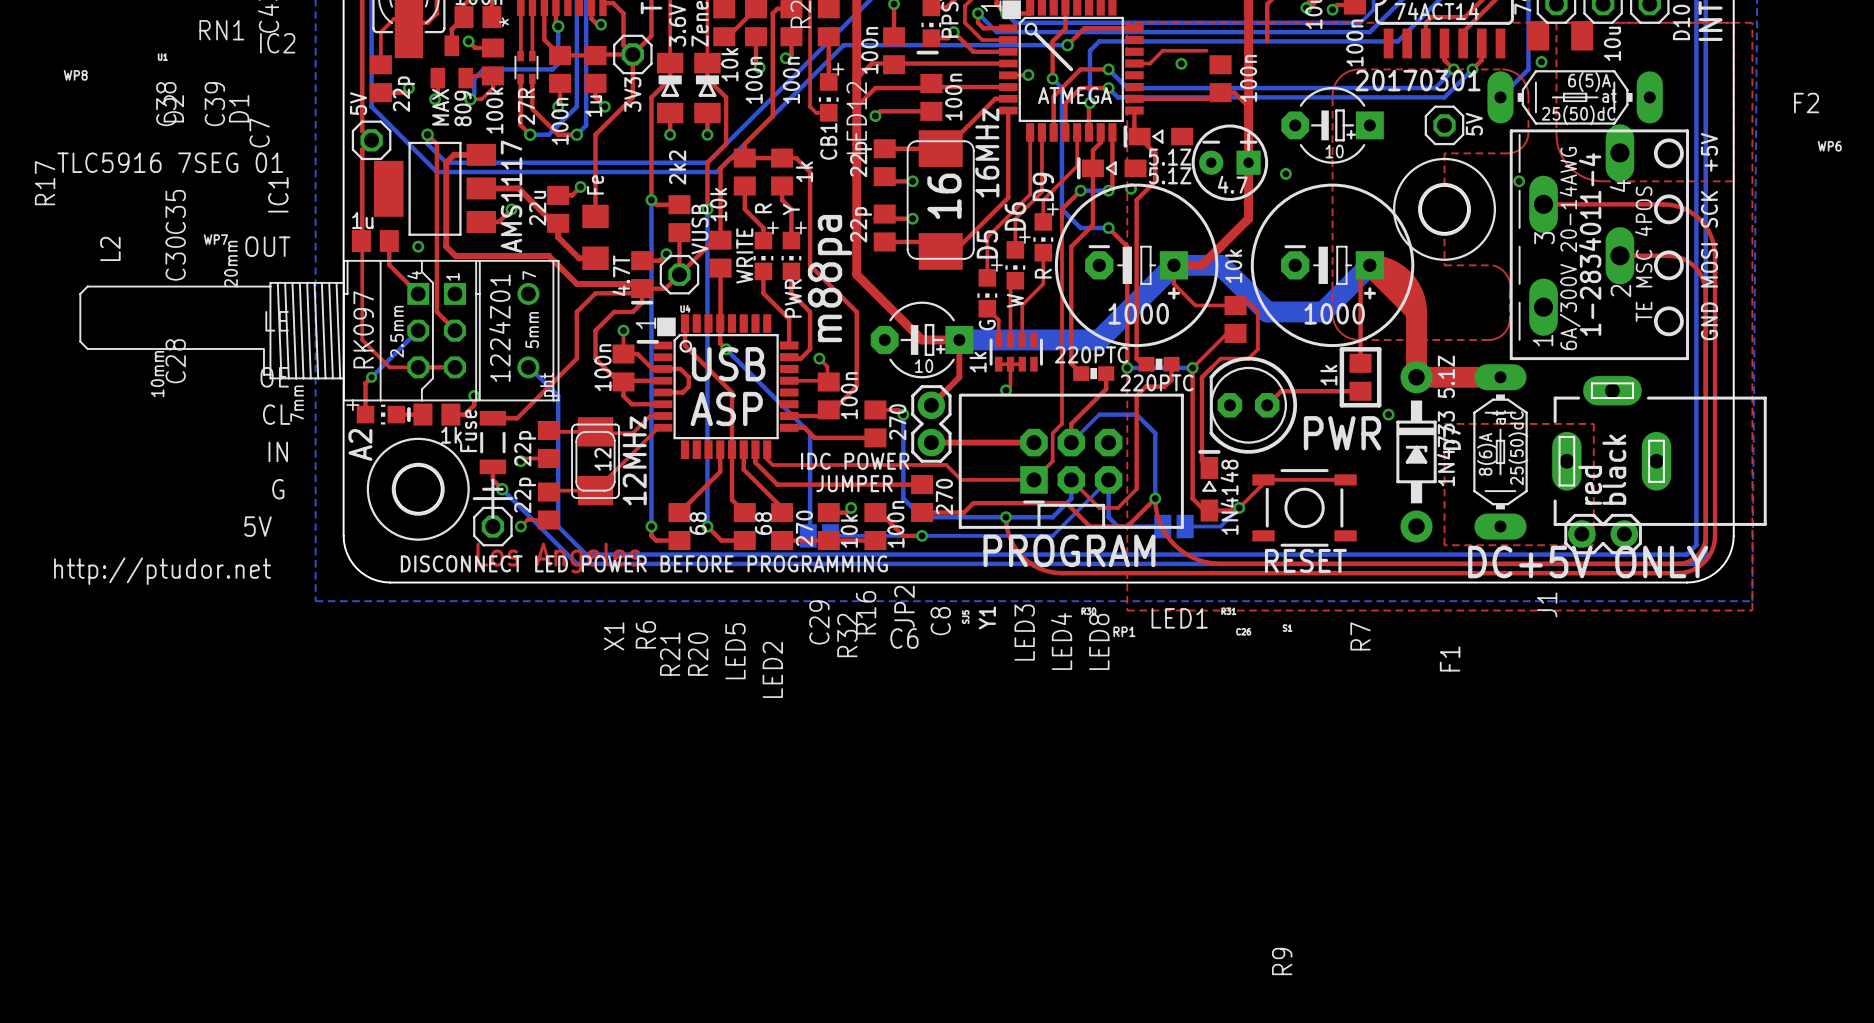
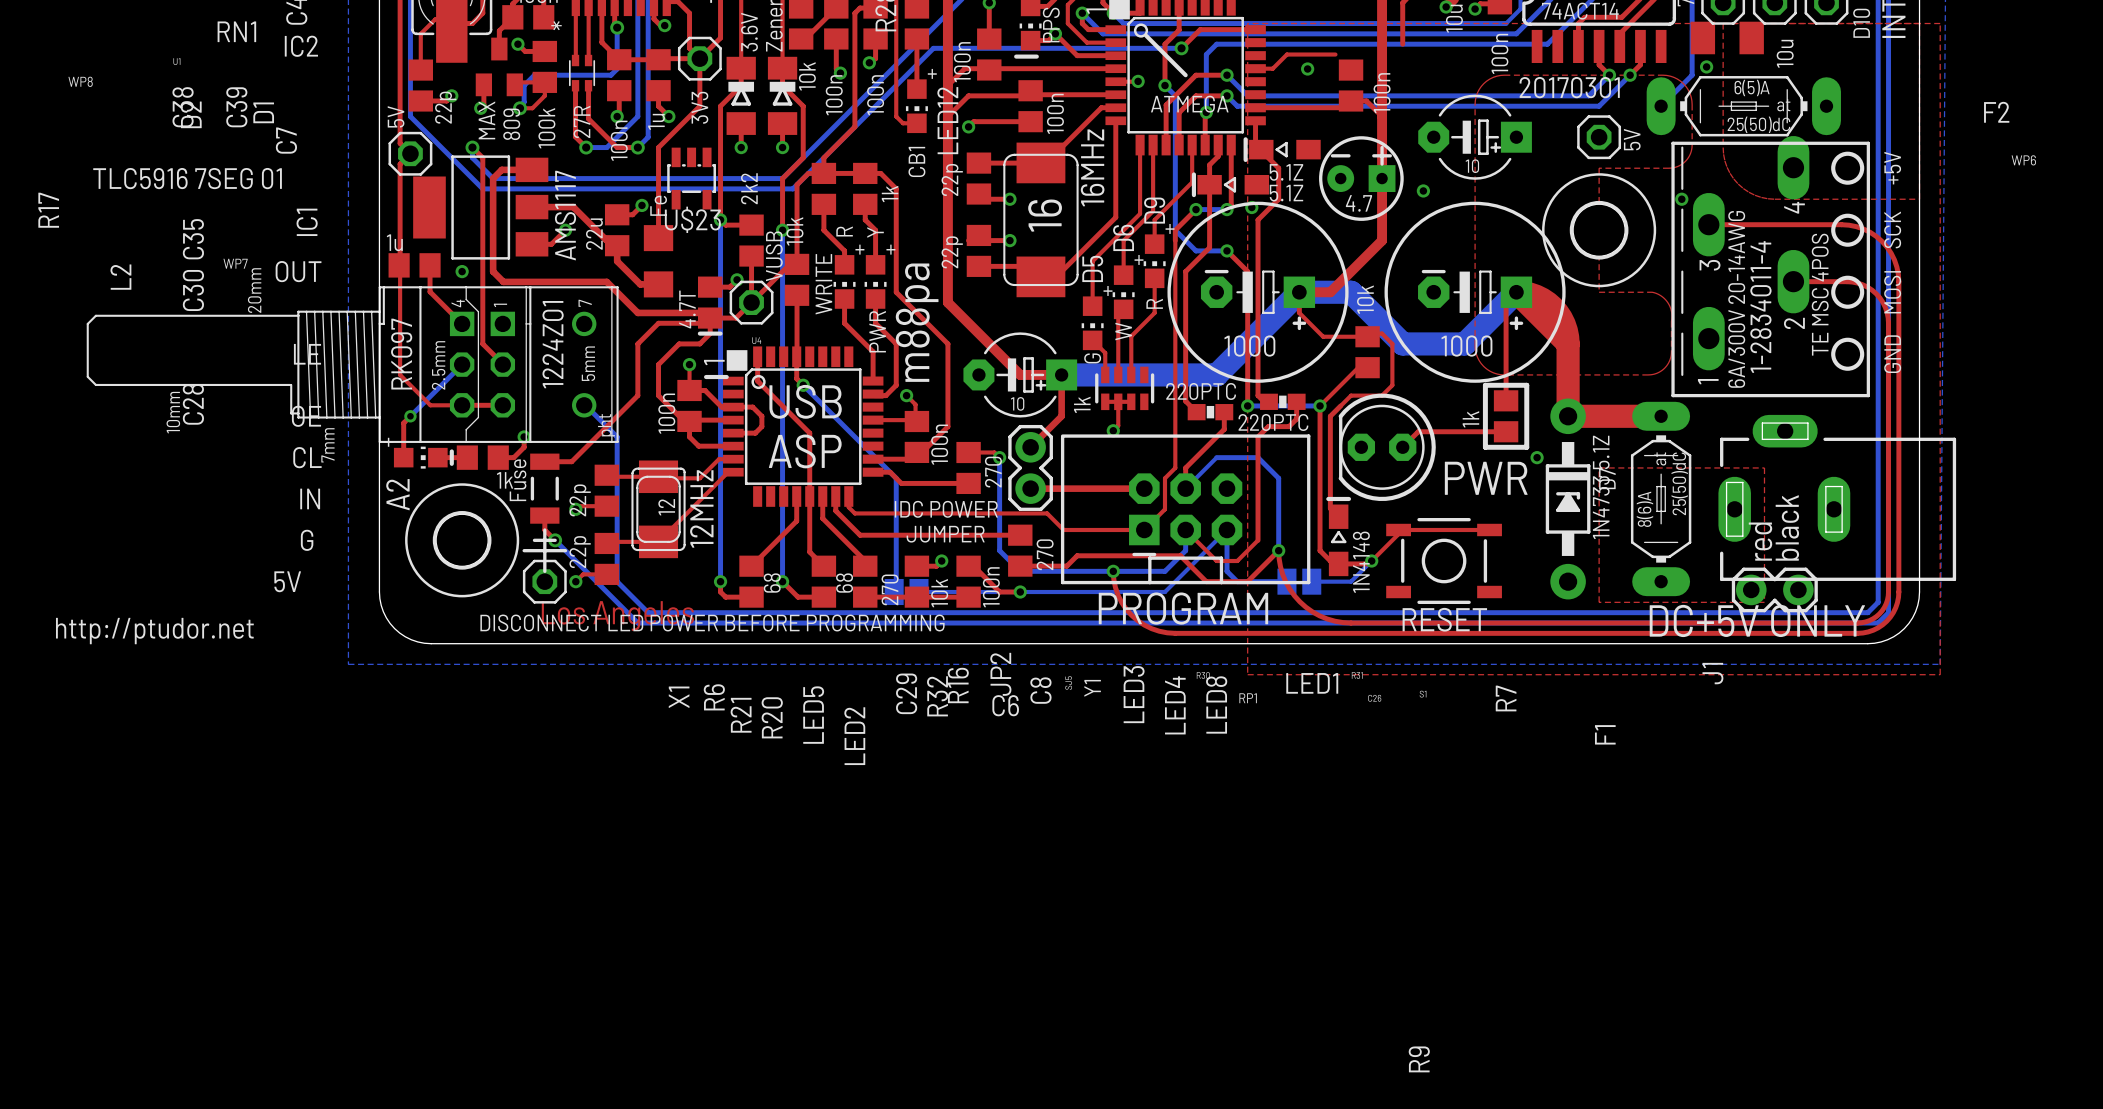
U$23: none -> (691, 178)

